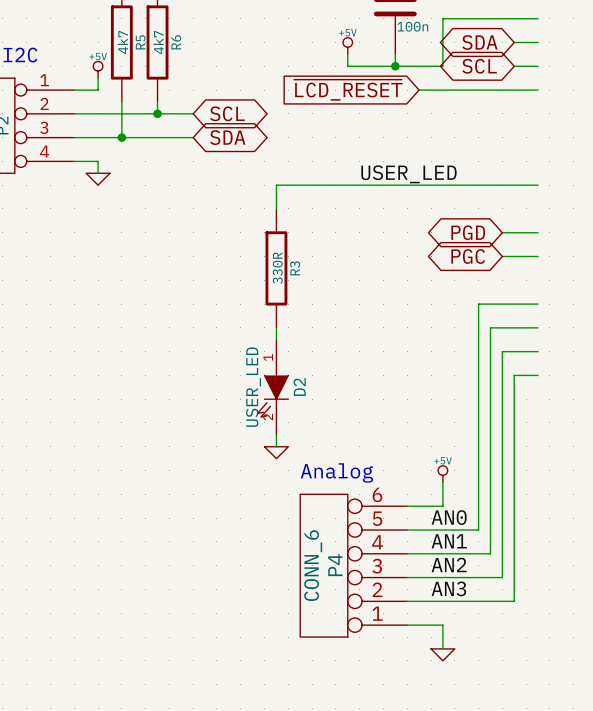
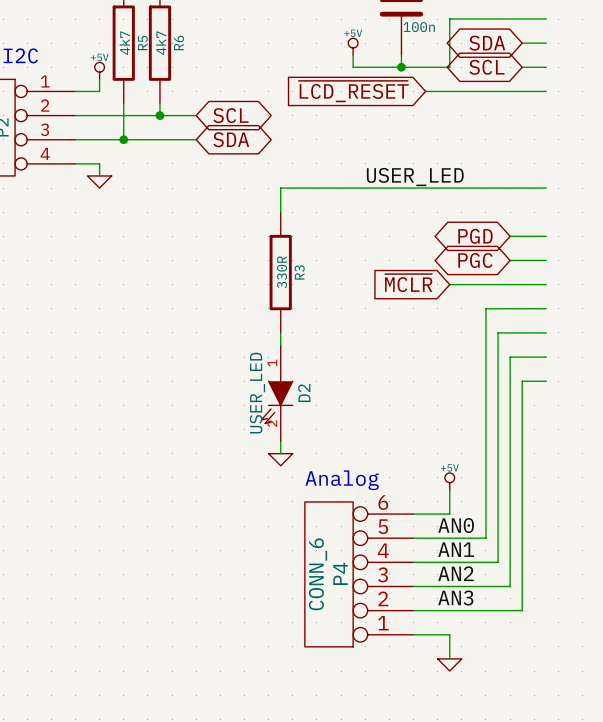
global label: none -> ~{MCLR} (408, 283)
wire: none -> (449, 284) (546, 284)

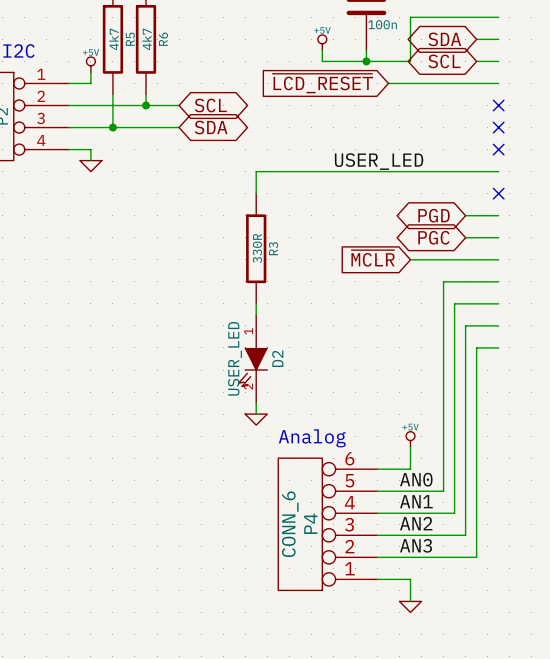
no-connect mark: none -> (498, 105)
no-connect mark: none -> (498, 127)
no-connect mark: none -> (498, 149)
no-connect mark: none -> (498, 193)

